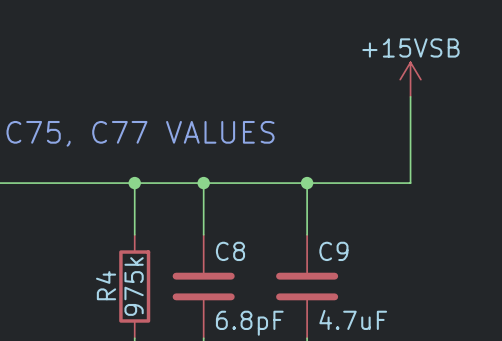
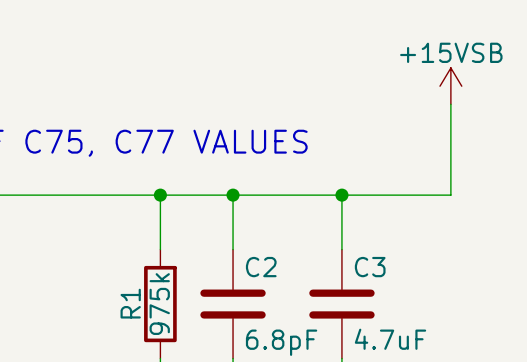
C8 name: C8 (230, 251) -> C2 (261, 267)
C9 name: C9 (333, 251) -> C3 (370, 267)
R4 name: R4 (106, 285) -> R1 (130, 303)

